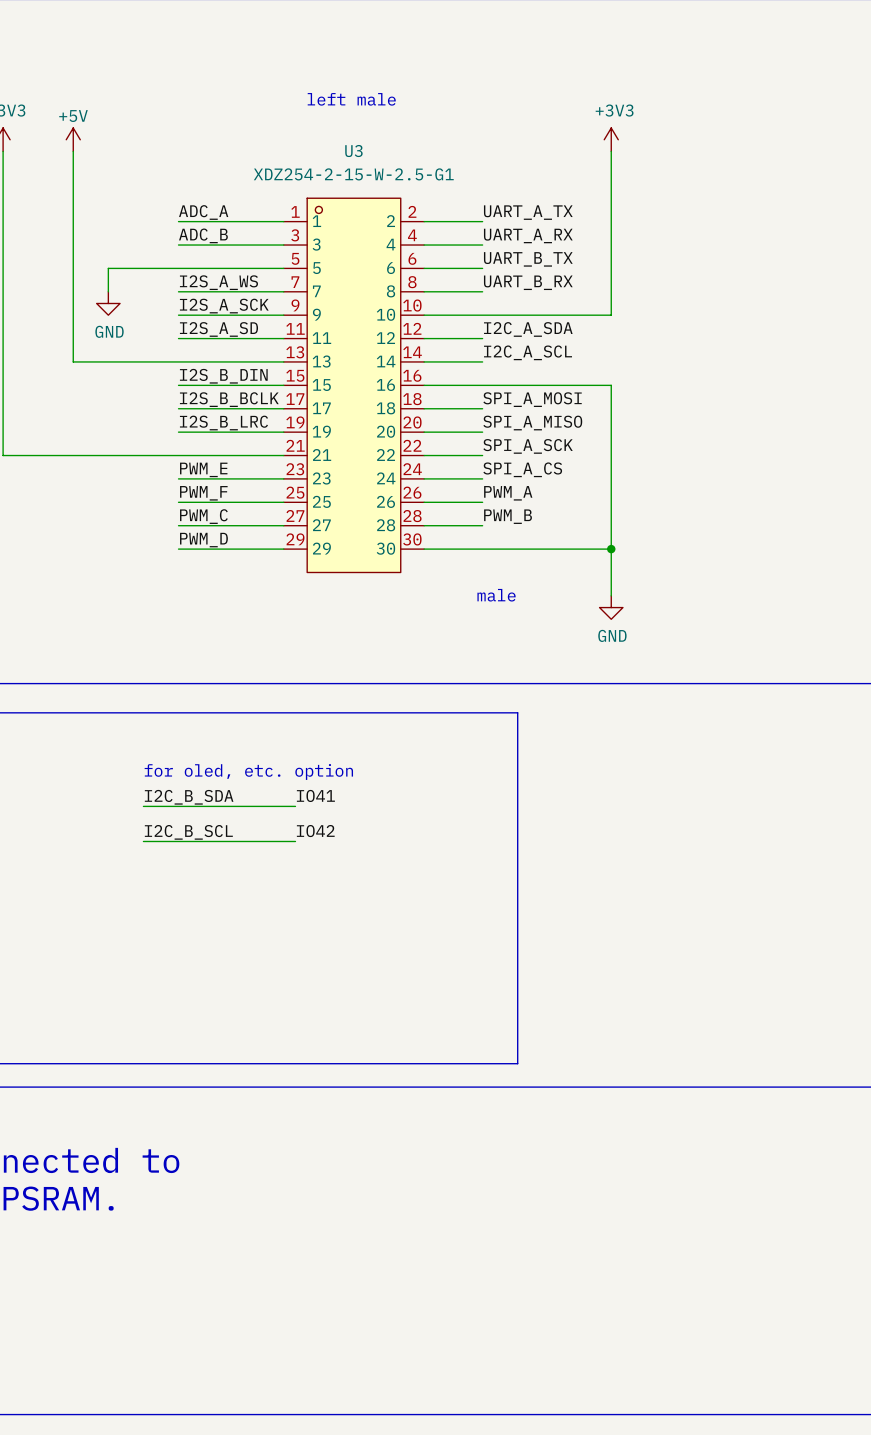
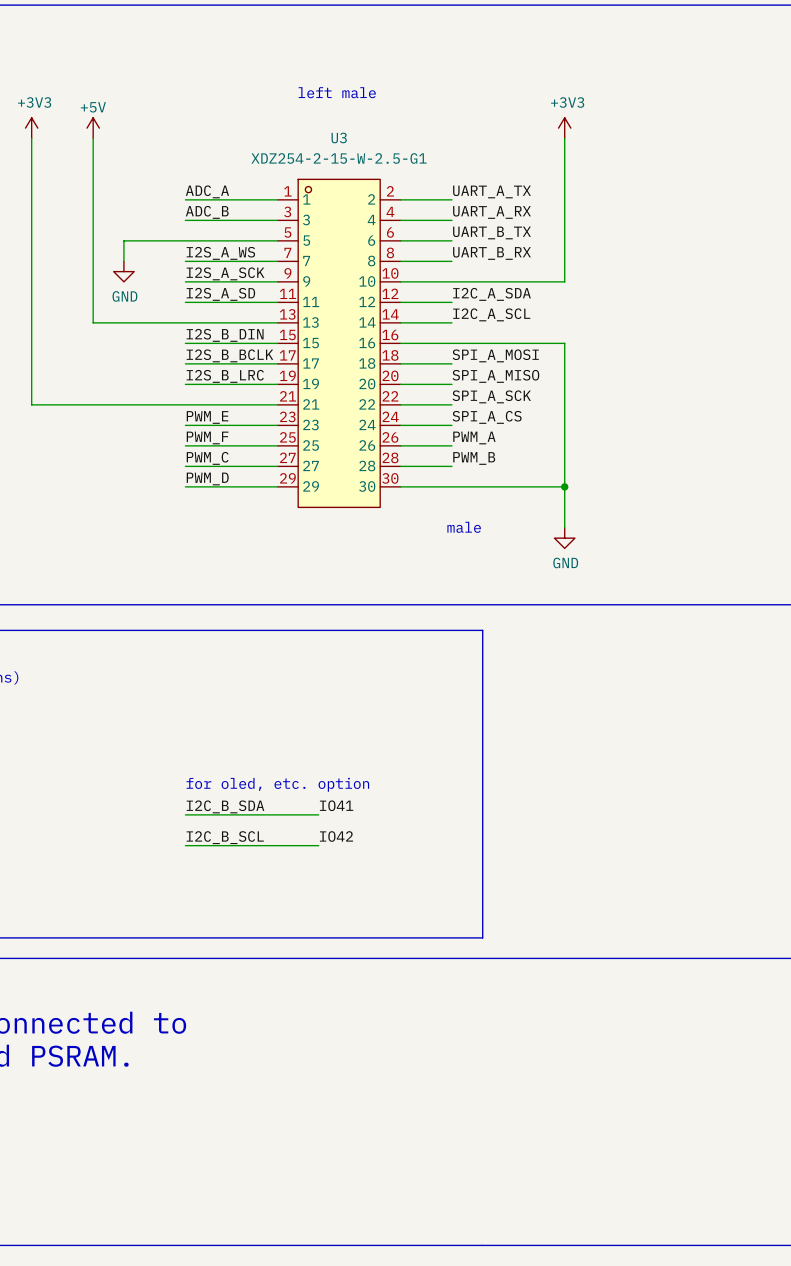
text position: for oled, etc. option (248, 771) -> for oled, etc. option (277, 784)
label position: IO41 (315, 795) -> IO41 (336, 805)
label position: I2C_B_SDA (189, 797) -> I2C_B_SDA (225, 806)
wire: (143, 806) (295, 806) -> (185, 814) (318, 814)
label position: IO42 (315, 831) -> IO42 (336, 836)
label position: I2C_B_SCL (188, 832) -> I2C_B_SCL (225, 837)
wire: (143, 841) (295, 841) -> (185, 845) (318, 845)

